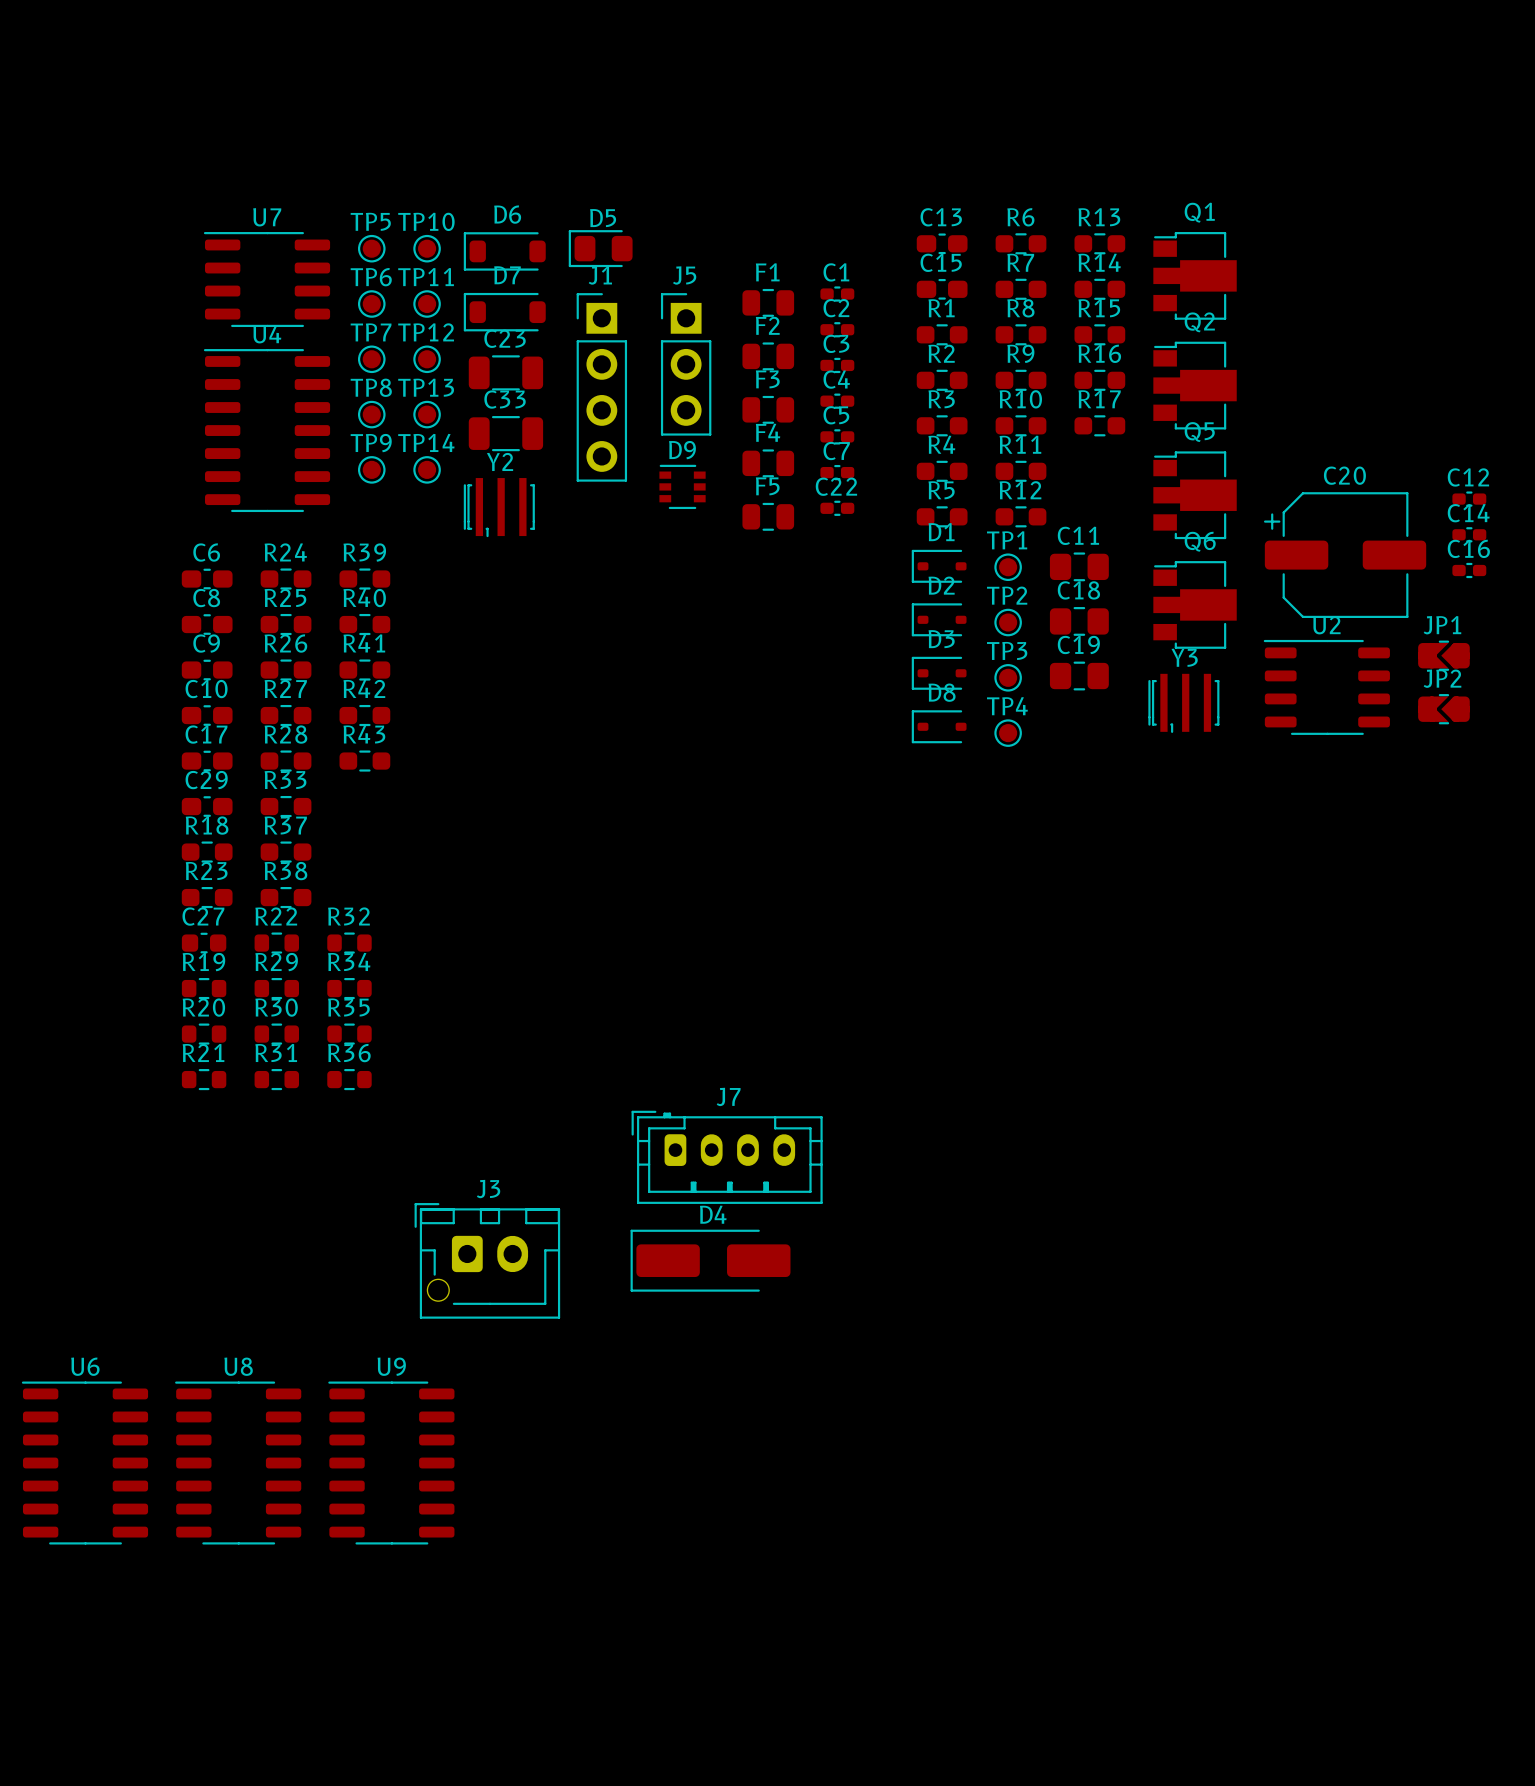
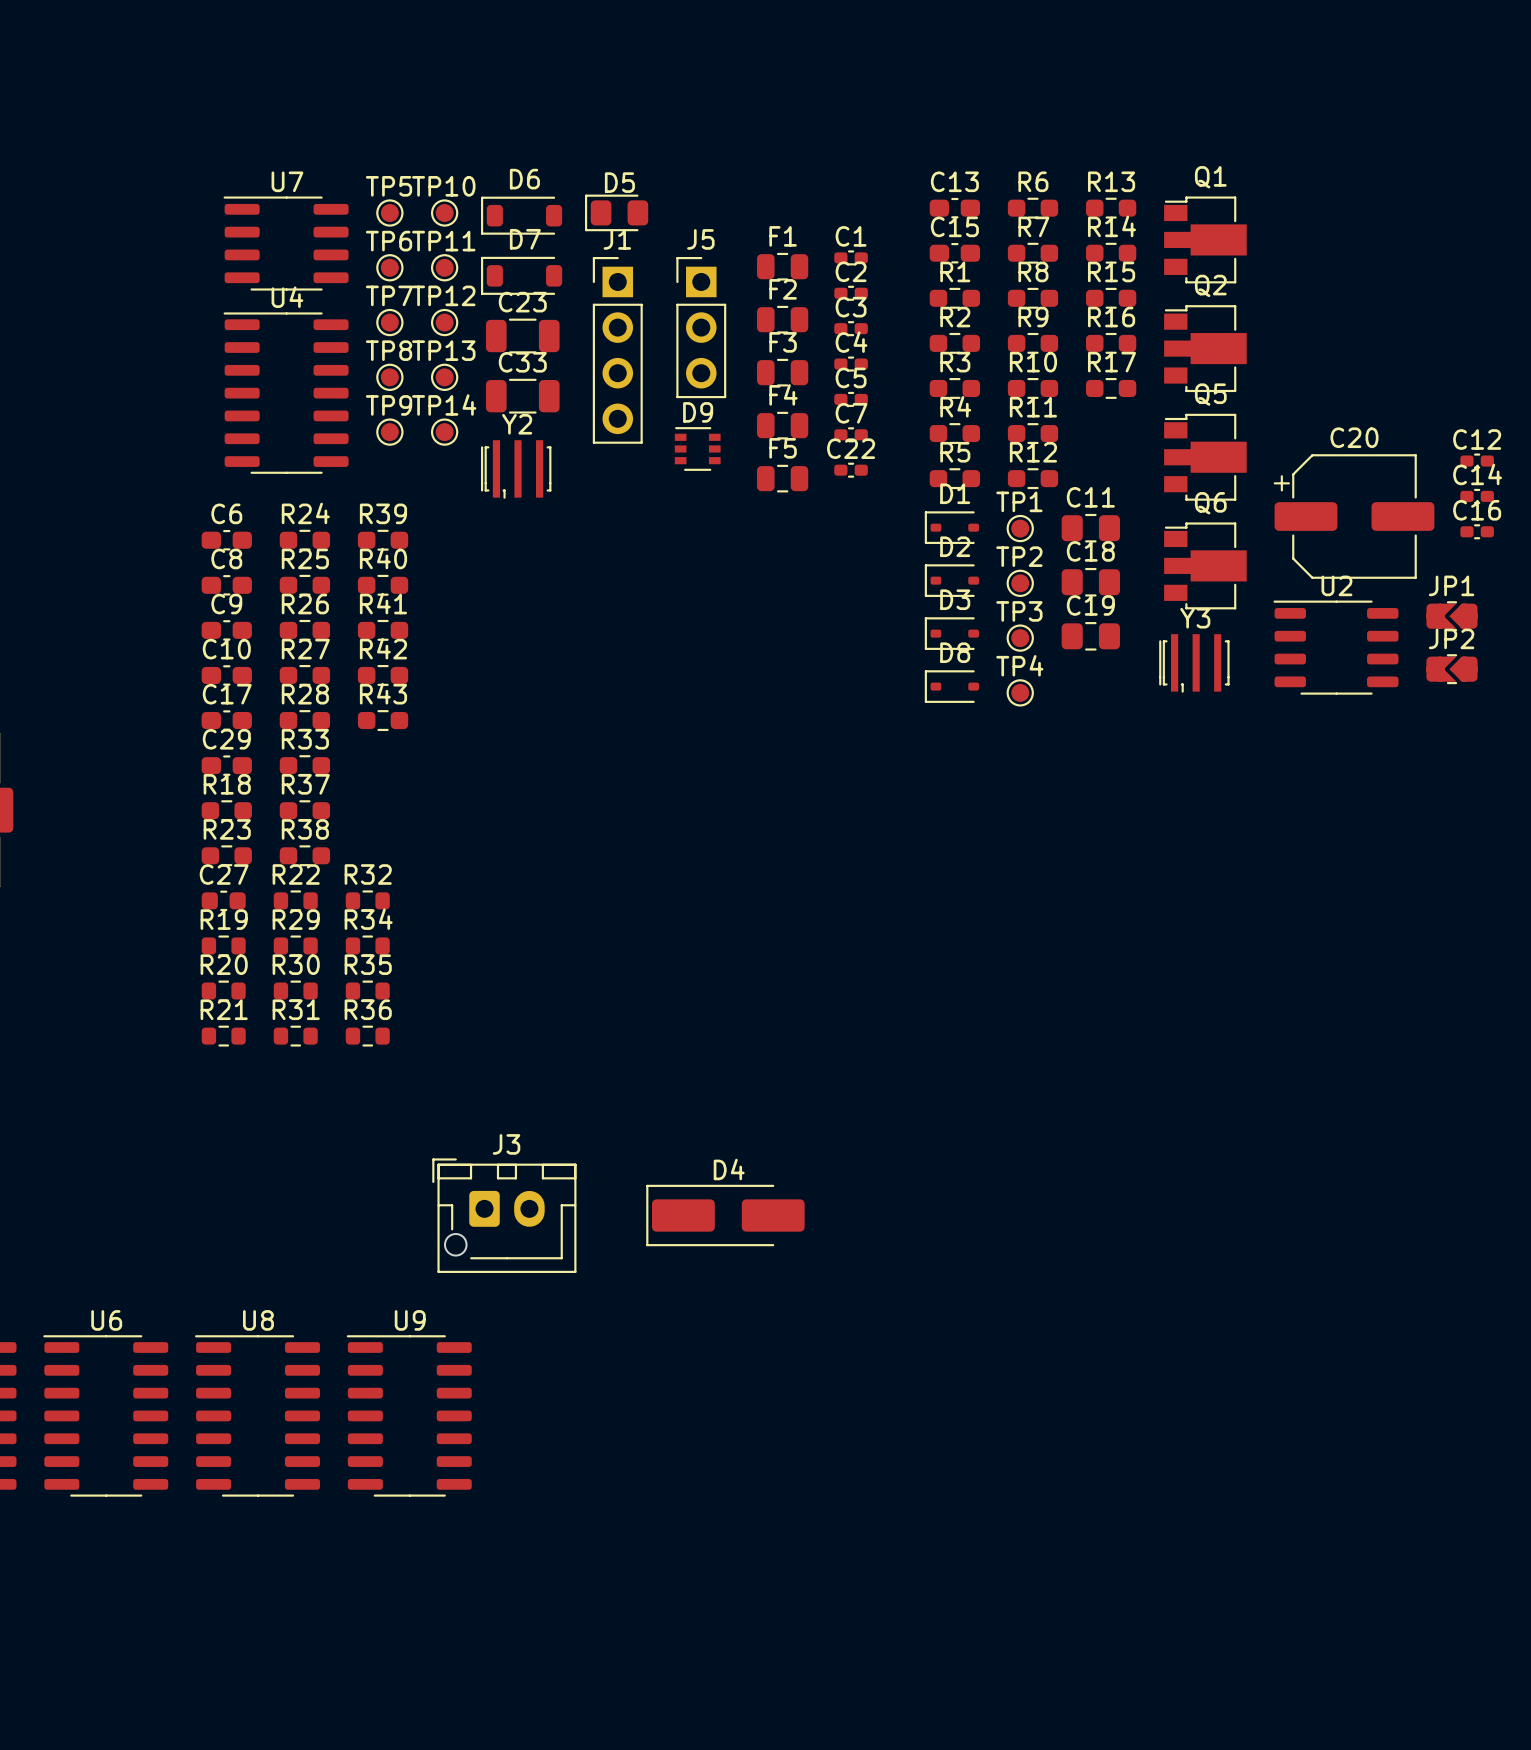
J7: (727, 1157) -> none

